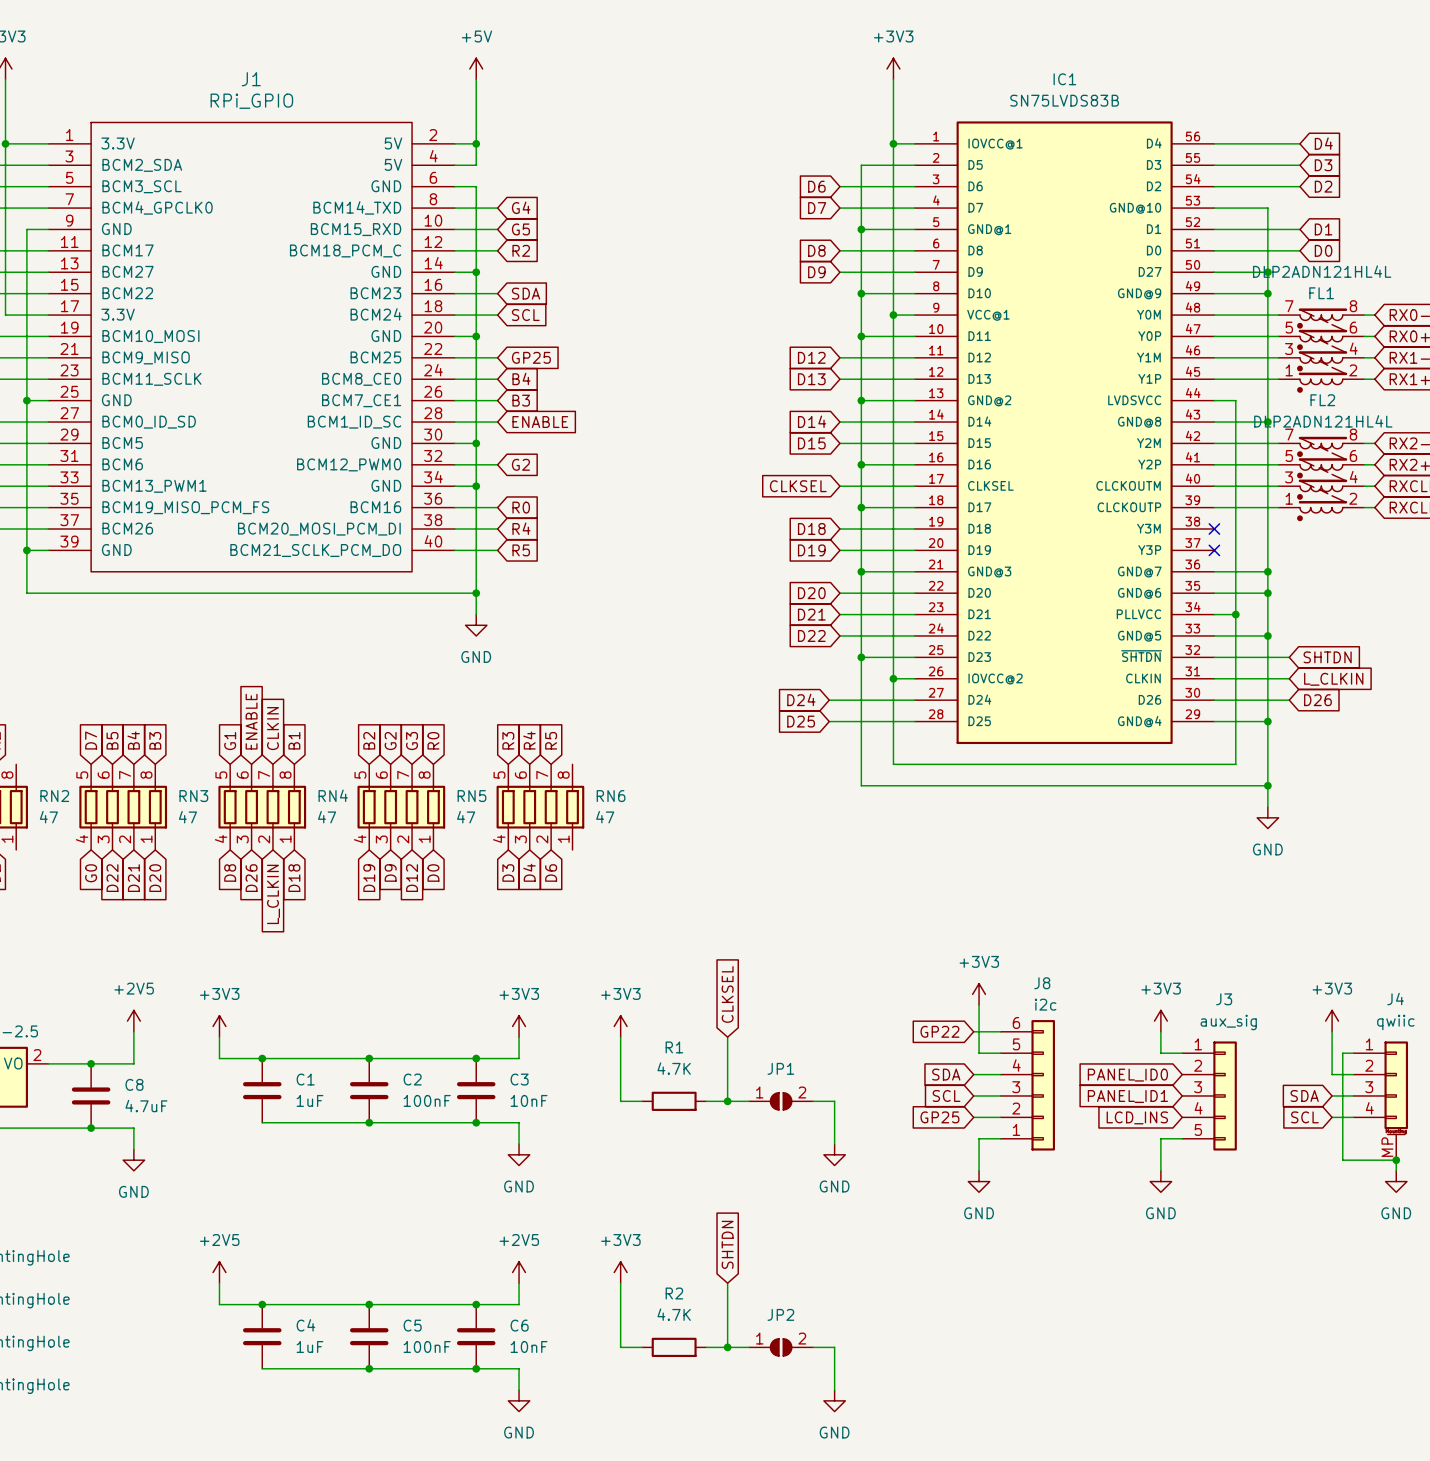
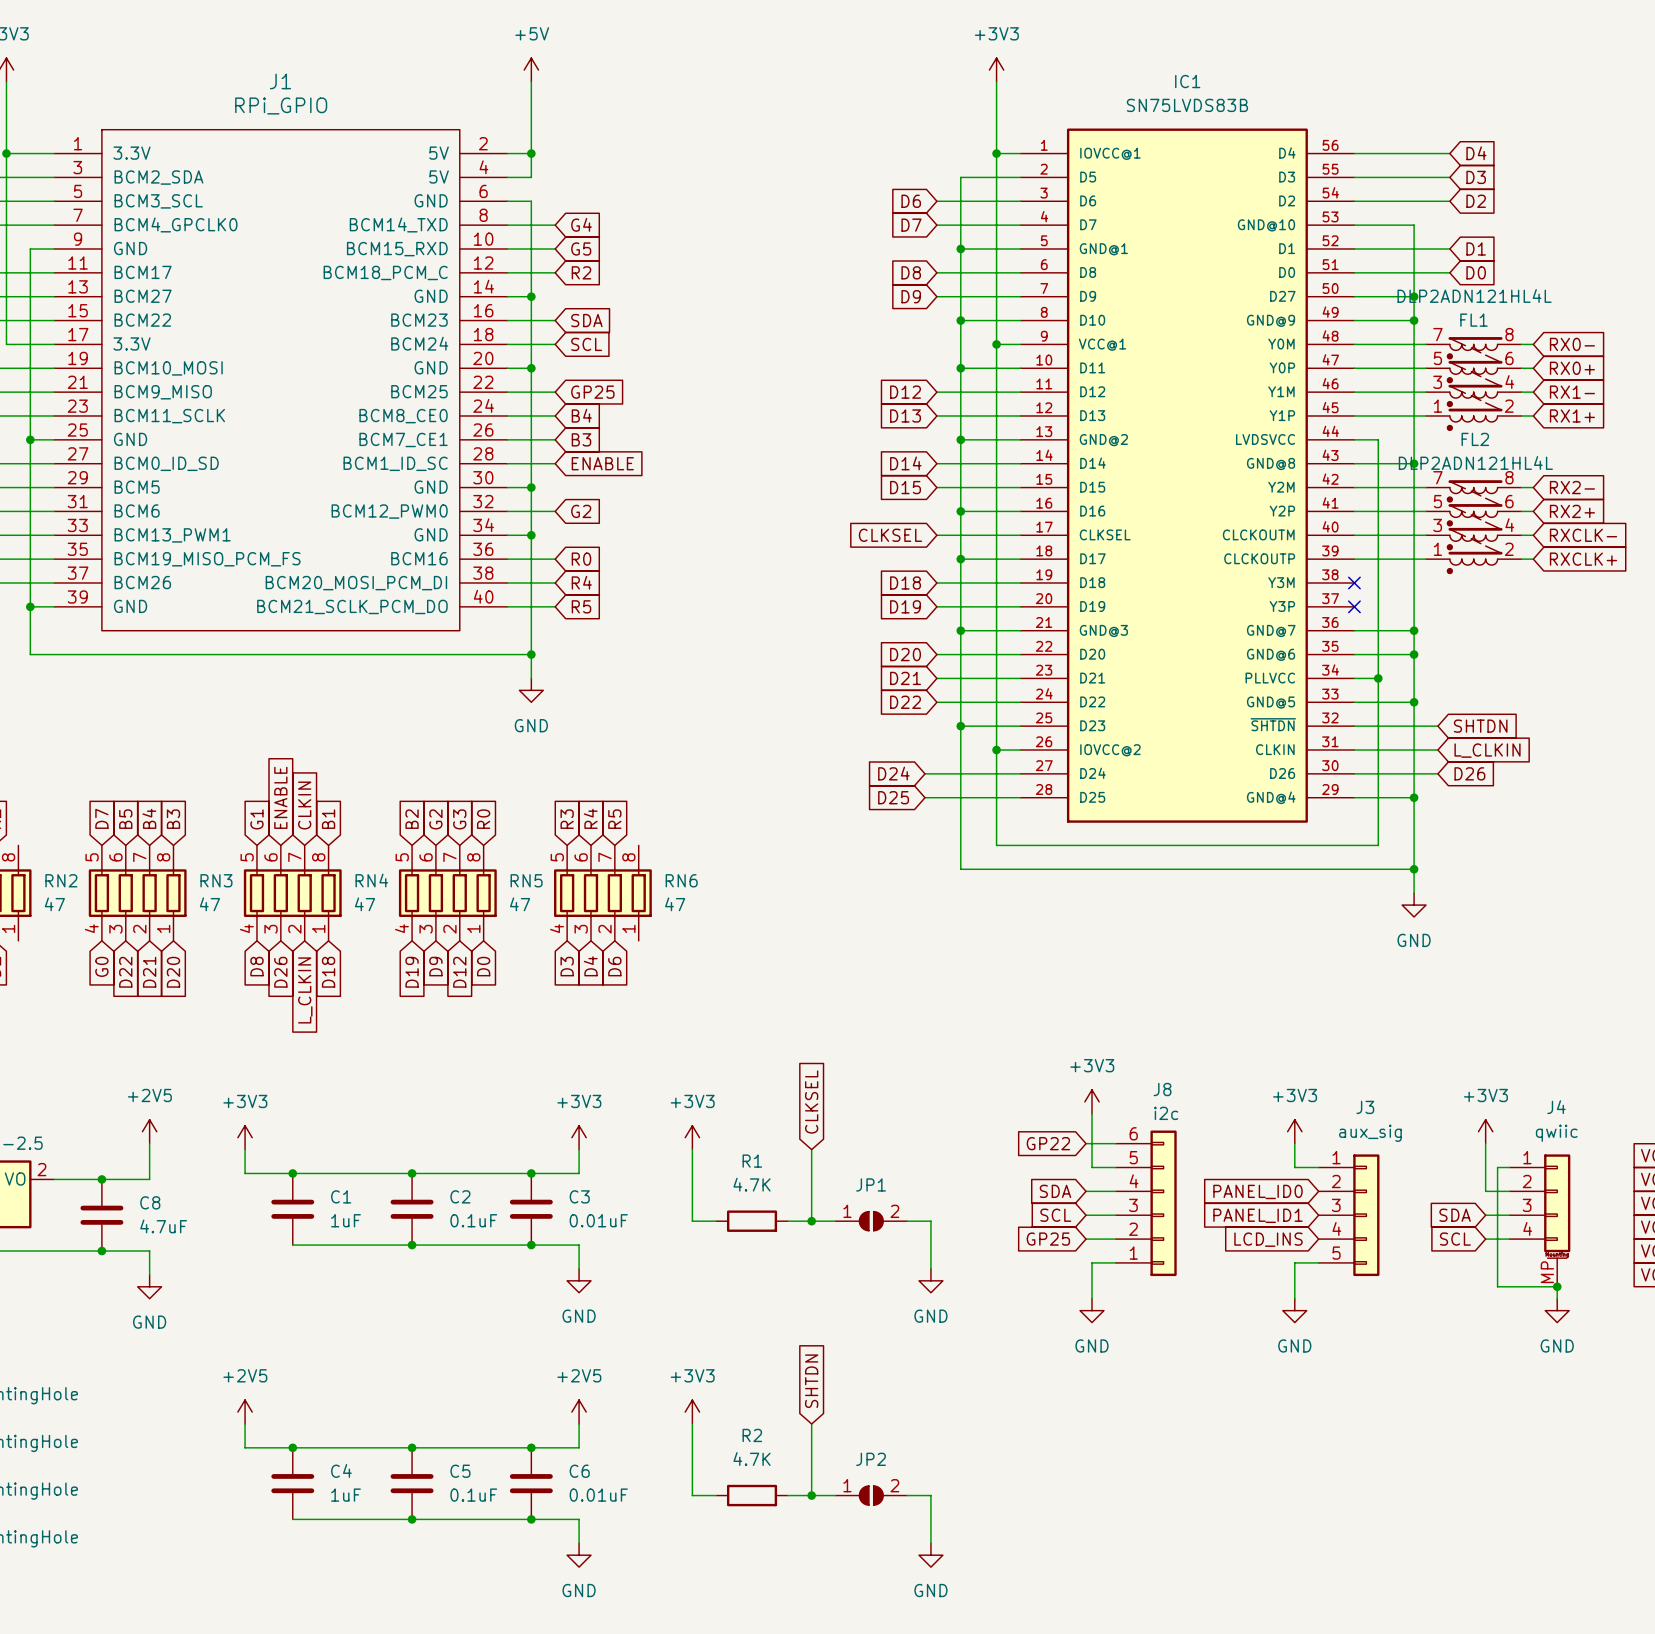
C2 value: 100nF (427, 1100) -> 0.1uF (473, 1220)
C3 value: 10nF (529, 1100) -> 0.01uF (598, 1220)
C5 value: 100nF (427, 1346) -> 0.1uF (473, 1495)
C6 value: 10nF (529, 1346) -> 0.01uF (598, 1495)

